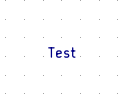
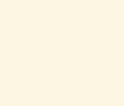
text: Test (61, 52) -> none

